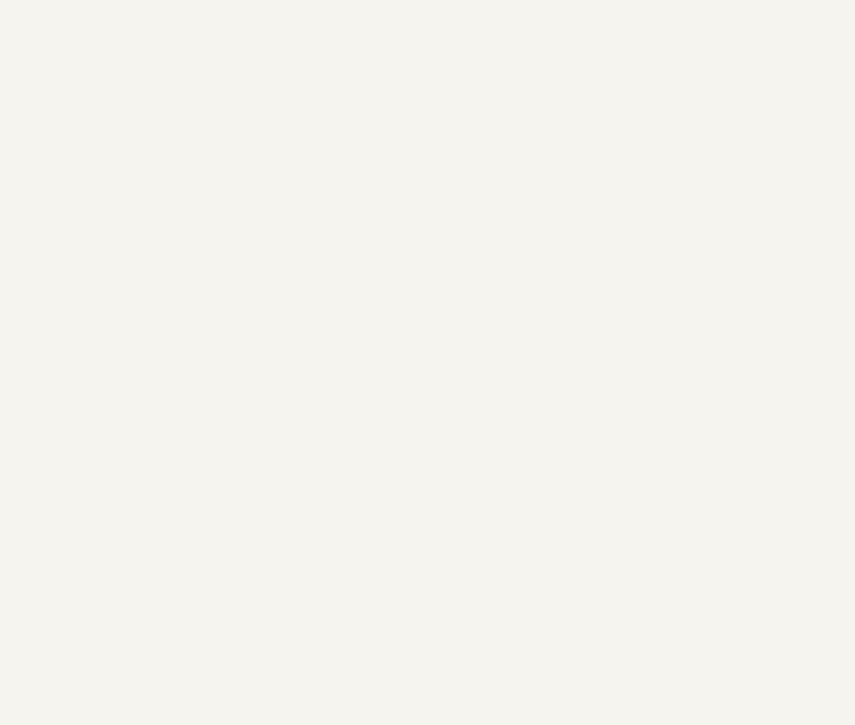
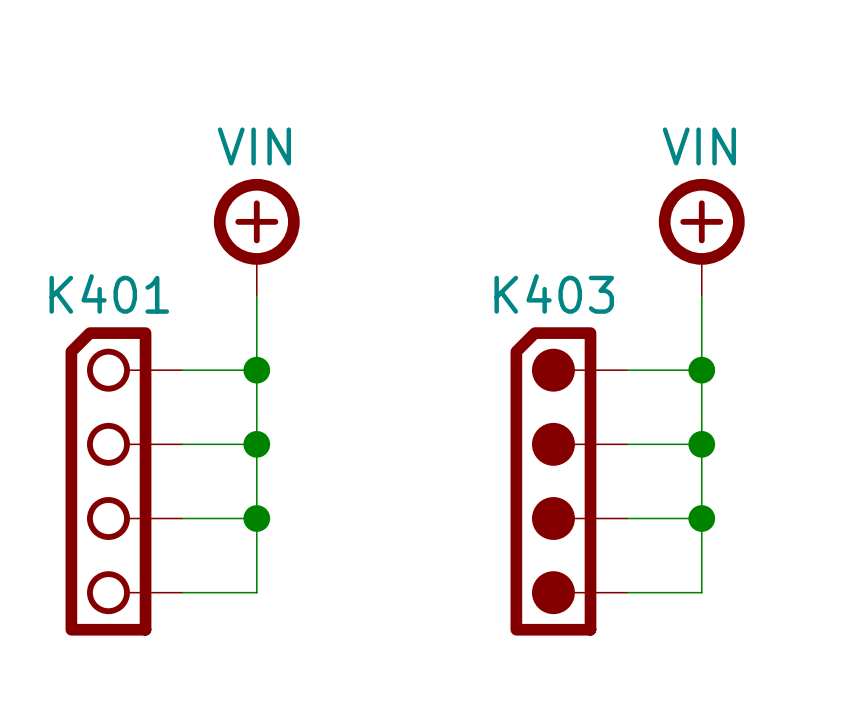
power symbol: none -> (256, 237)
power symbol: none -> (701, 237)
wire: none -> (256, 296) (256, 592) (182, 592)
wire: none -> (701, 296) (701, 592) (627, 592)
wire: none -> (182, 370) (256, 370)
junction: none -> (256, 370)
wire: none -> (627, 370) (701, 370)
junction: none -> (701, 370)
wire: none -> (182, 444) (256, 444)
junction: none -> (256, 444)
wire: none -> (627, 444) (701, 444)
junction: none -> (701, 444)
K401: none -> (124, 481)
K403: none -> (569, 481)
wire: none -> (182, 518) (256, 518)
junction: none -> (256, 518)
wire: none -> (627, 518) (701, 518)
junction: none -> (701, 518)

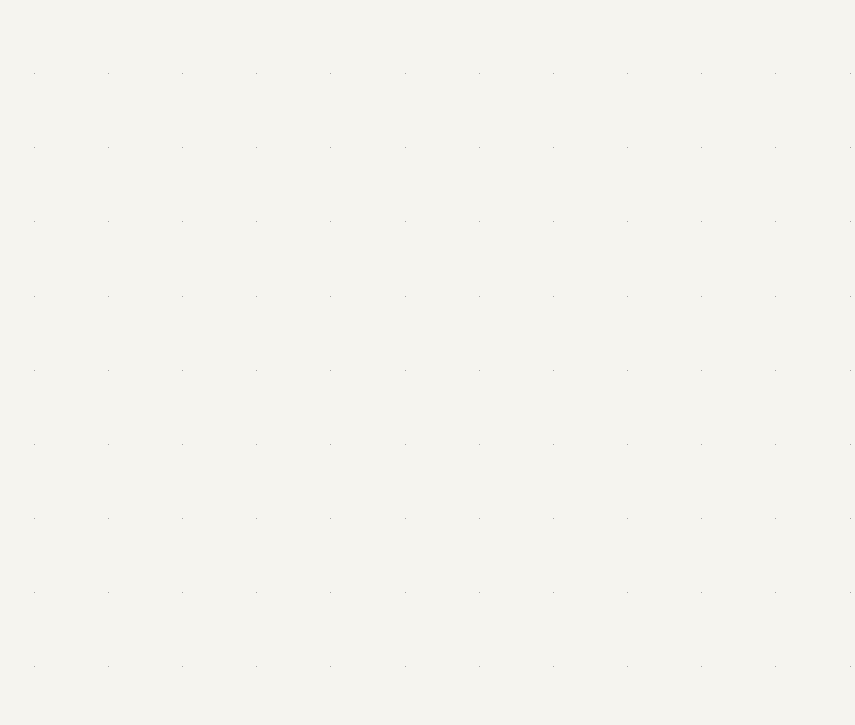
power symbol: (256, 237) -> none
power symbol: (701, 237) -> none
wire: (256, 296) (256, 592) (182, 592) -> none
wire: (701, 296) (701, 592) (627, 592) -> none
wire: (182, 370) (256, 370) -> none
junction: (256, 370) -> none
wire: (627, 370) (701, 370) -> none
junction: (701, 370) -> none
wire: (182, 444) (256, 444) -> none
junction: (256, 444) -> none
wire: (627, 444) (701, 444) -> none
junction: (701, 444) -> none
K401: (124, 481) -> none
K403: (569, 481) -> none
wire: (182, 518) (256, 518) -> none
junction: (256, 518) -> none
wire: (627, 518) (701, 518) -> none
junction: (701, 518) -> none

